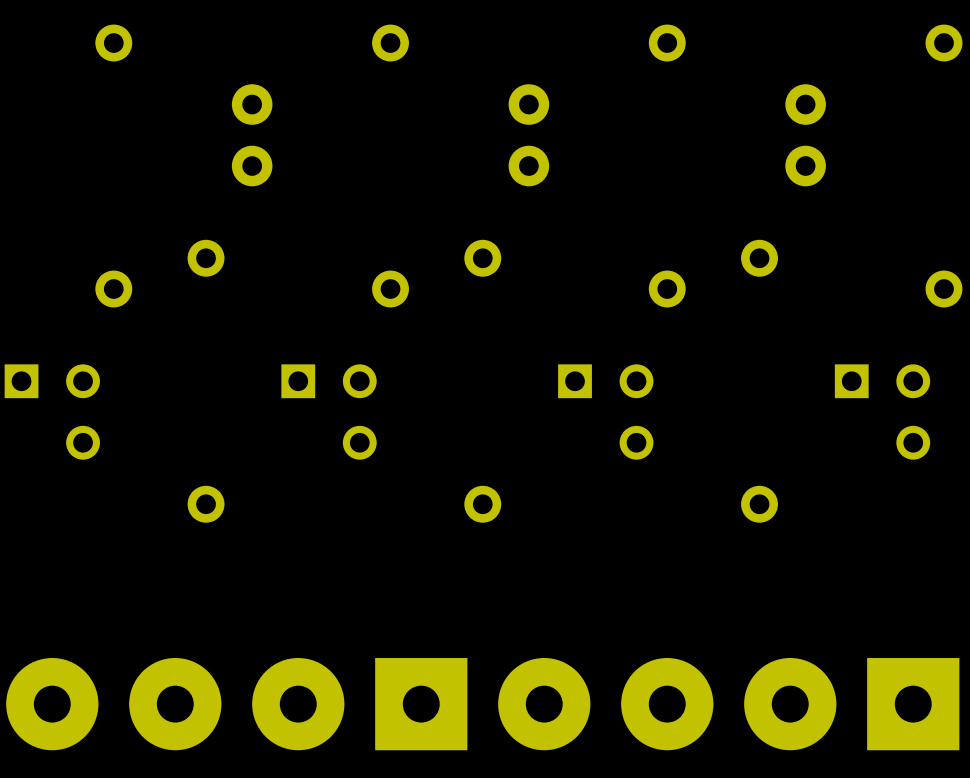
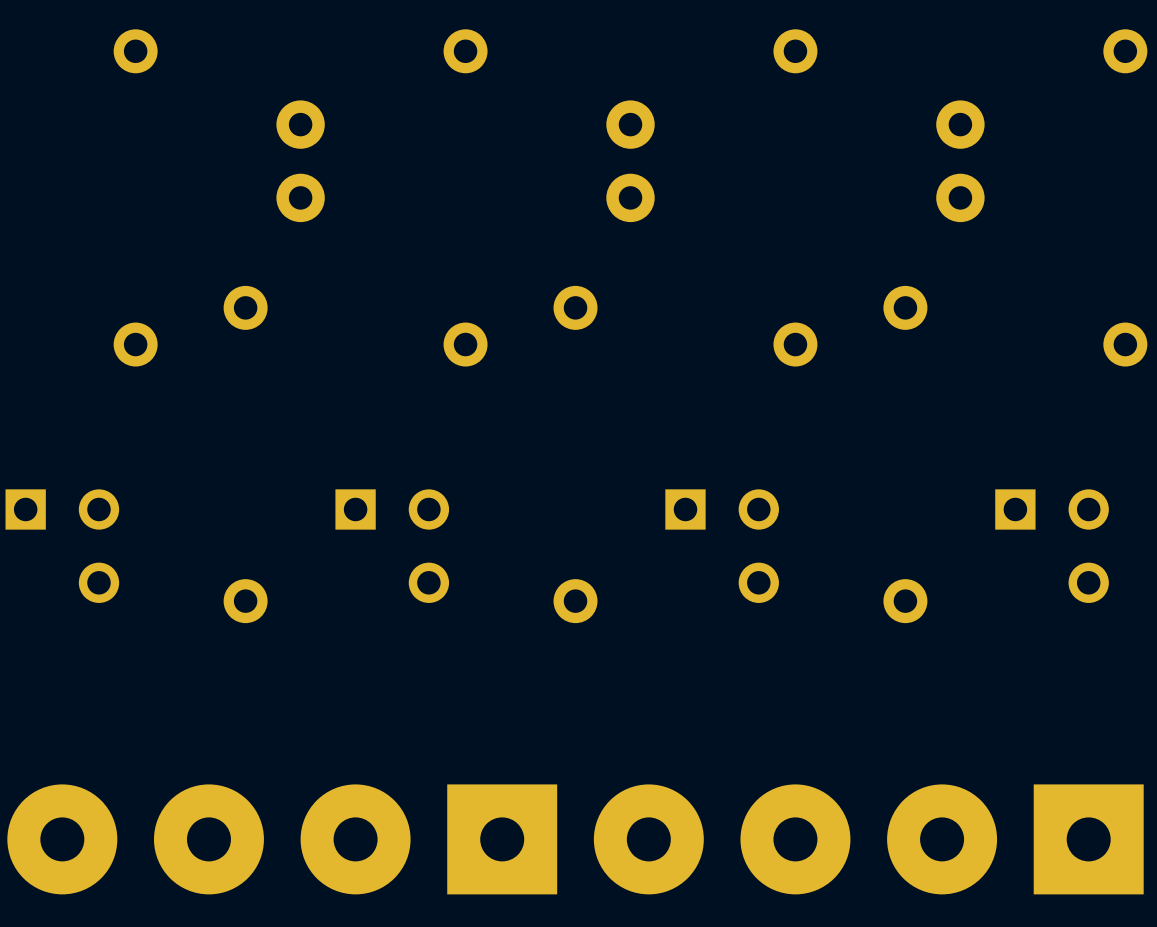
part position: (52, 412) -> (62, 546)
part position: (329, 412) -> (392, 546)
part position: (605, 412) -> (722, 546)
part position: (882, 412) -> (1052, 546)

